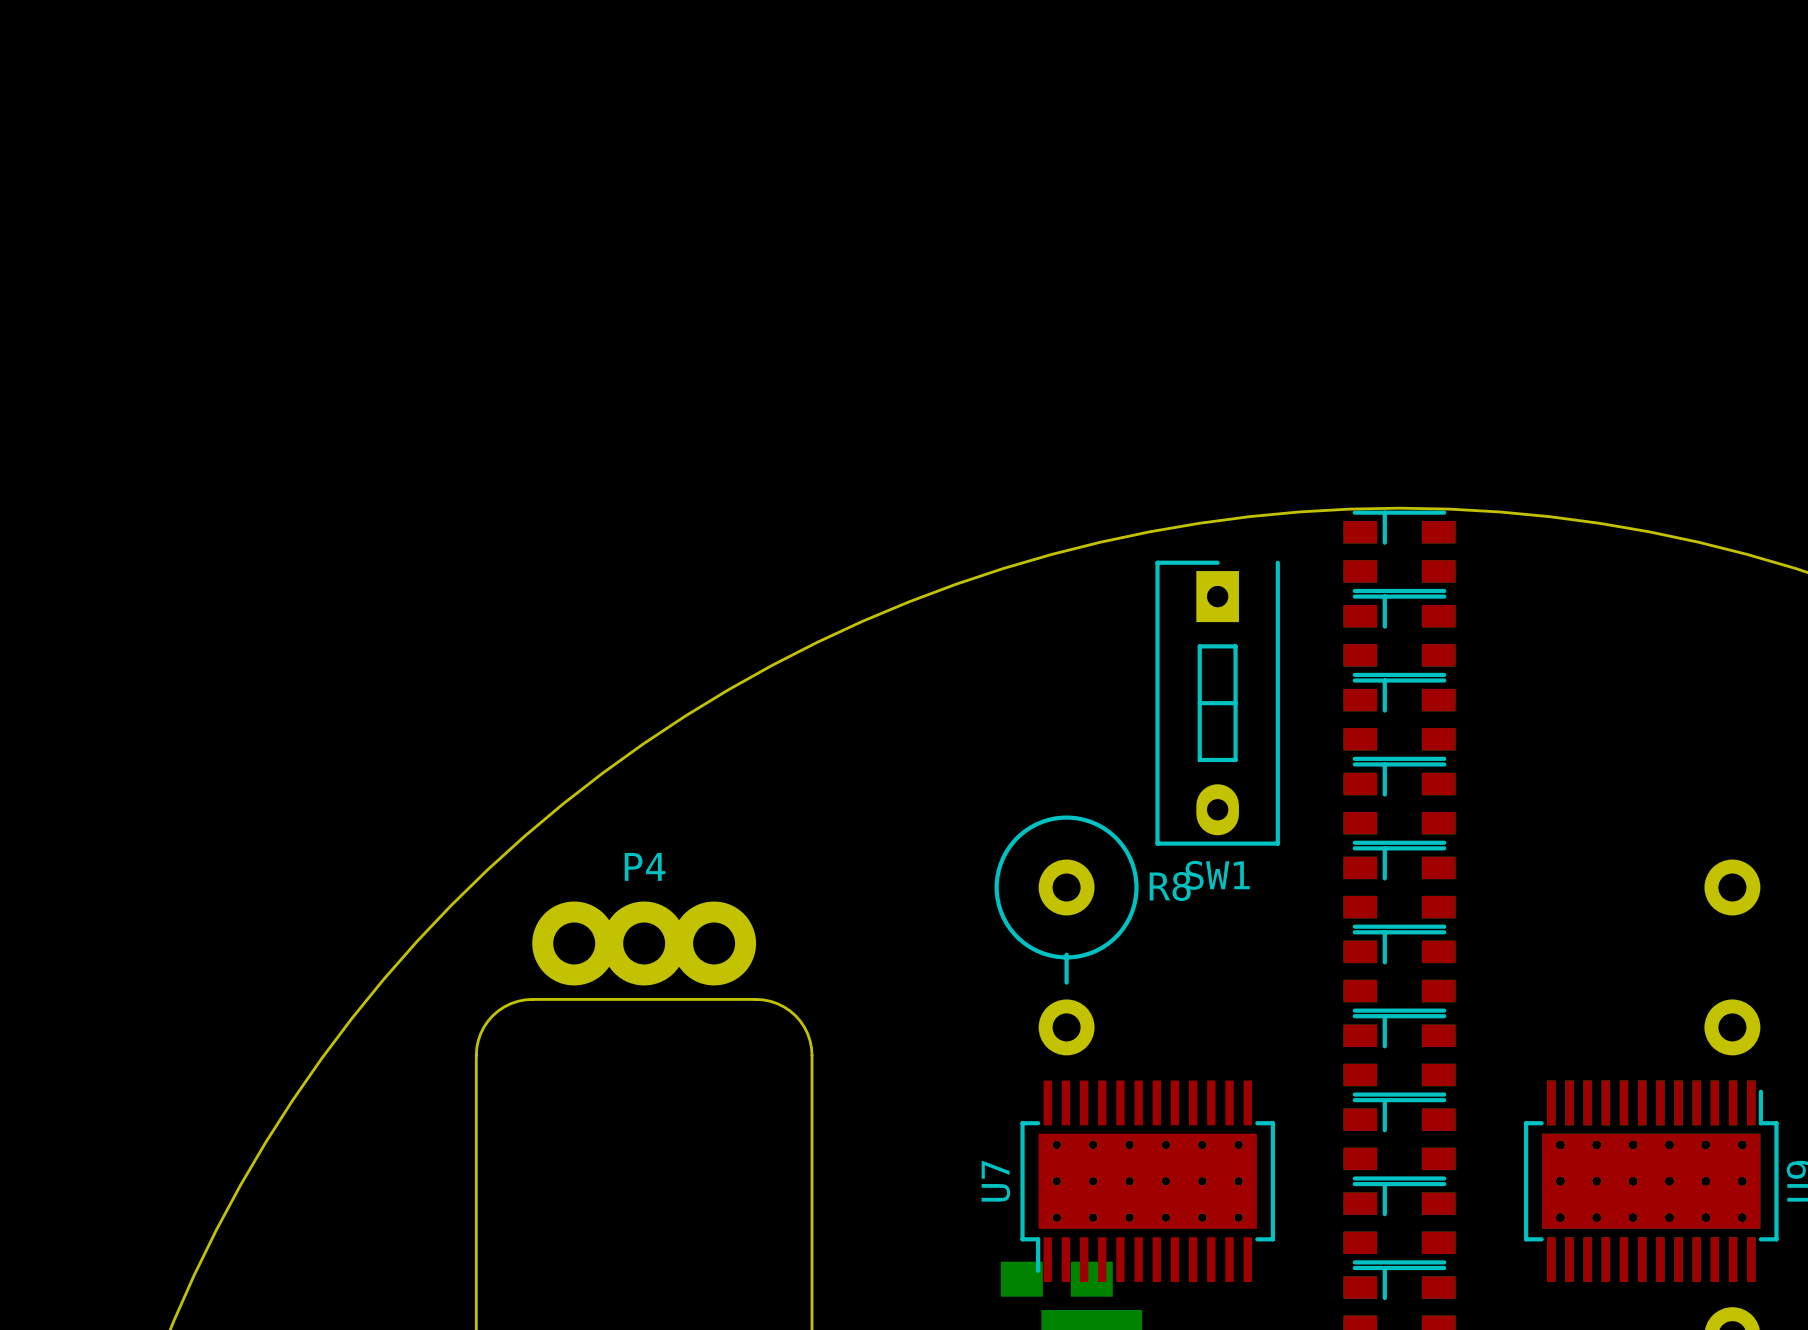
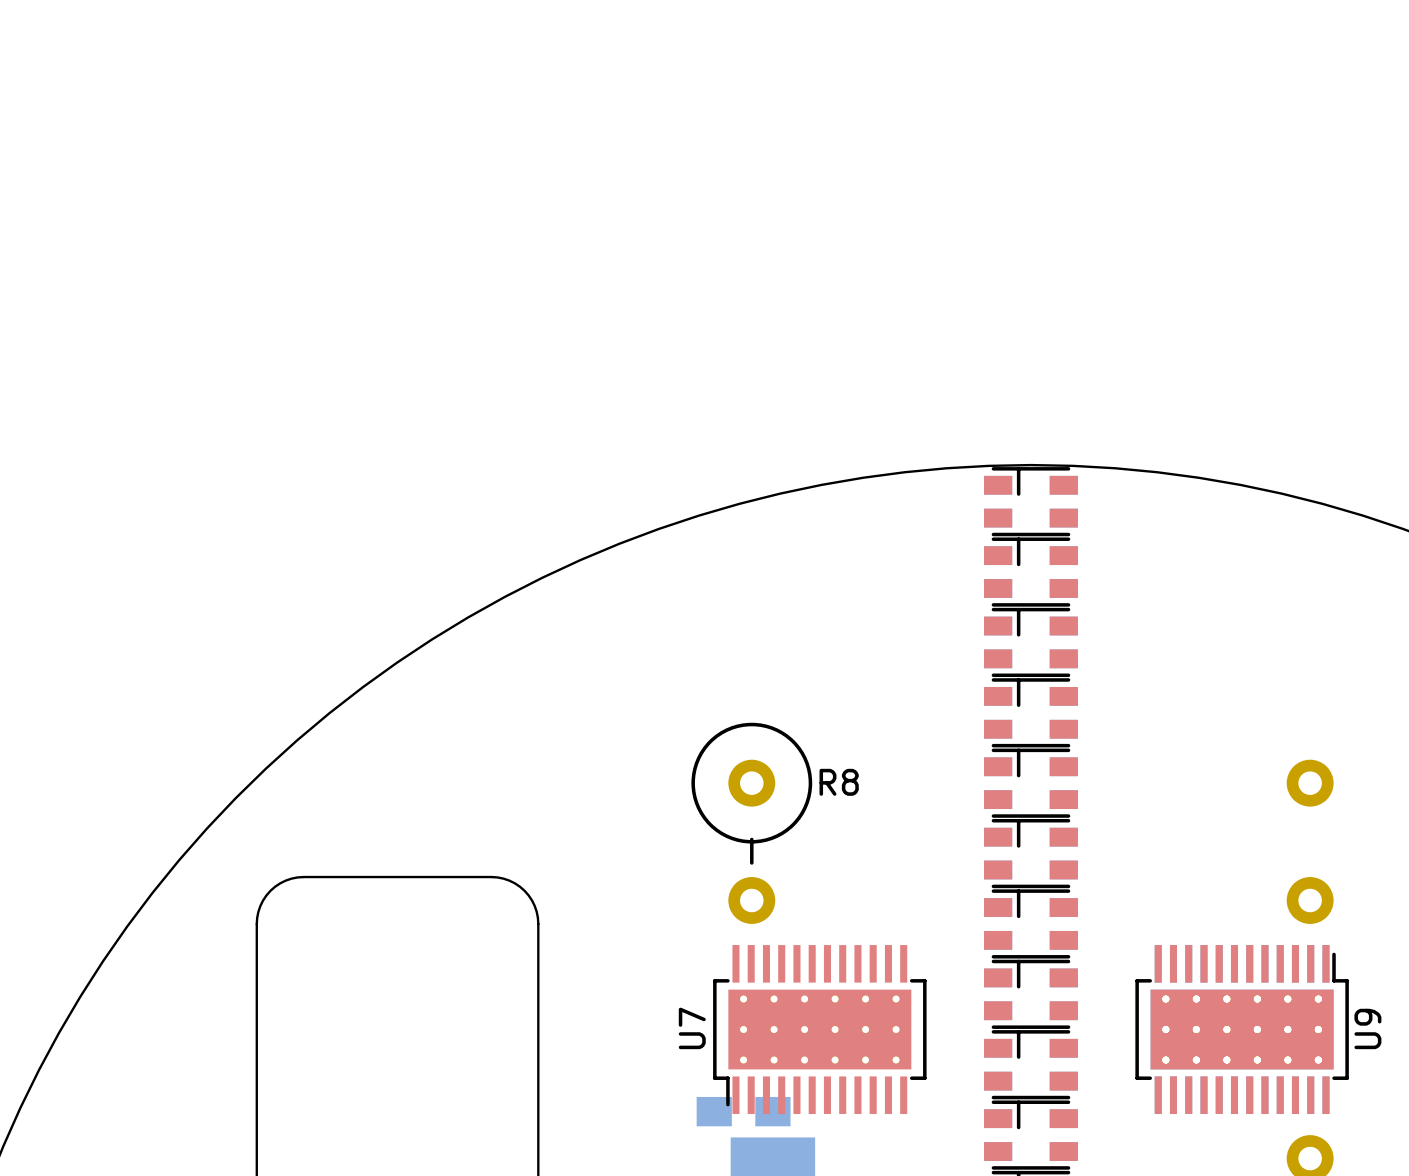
SW1: (1217, 703) -> none
P4: (644, 943) -> none

